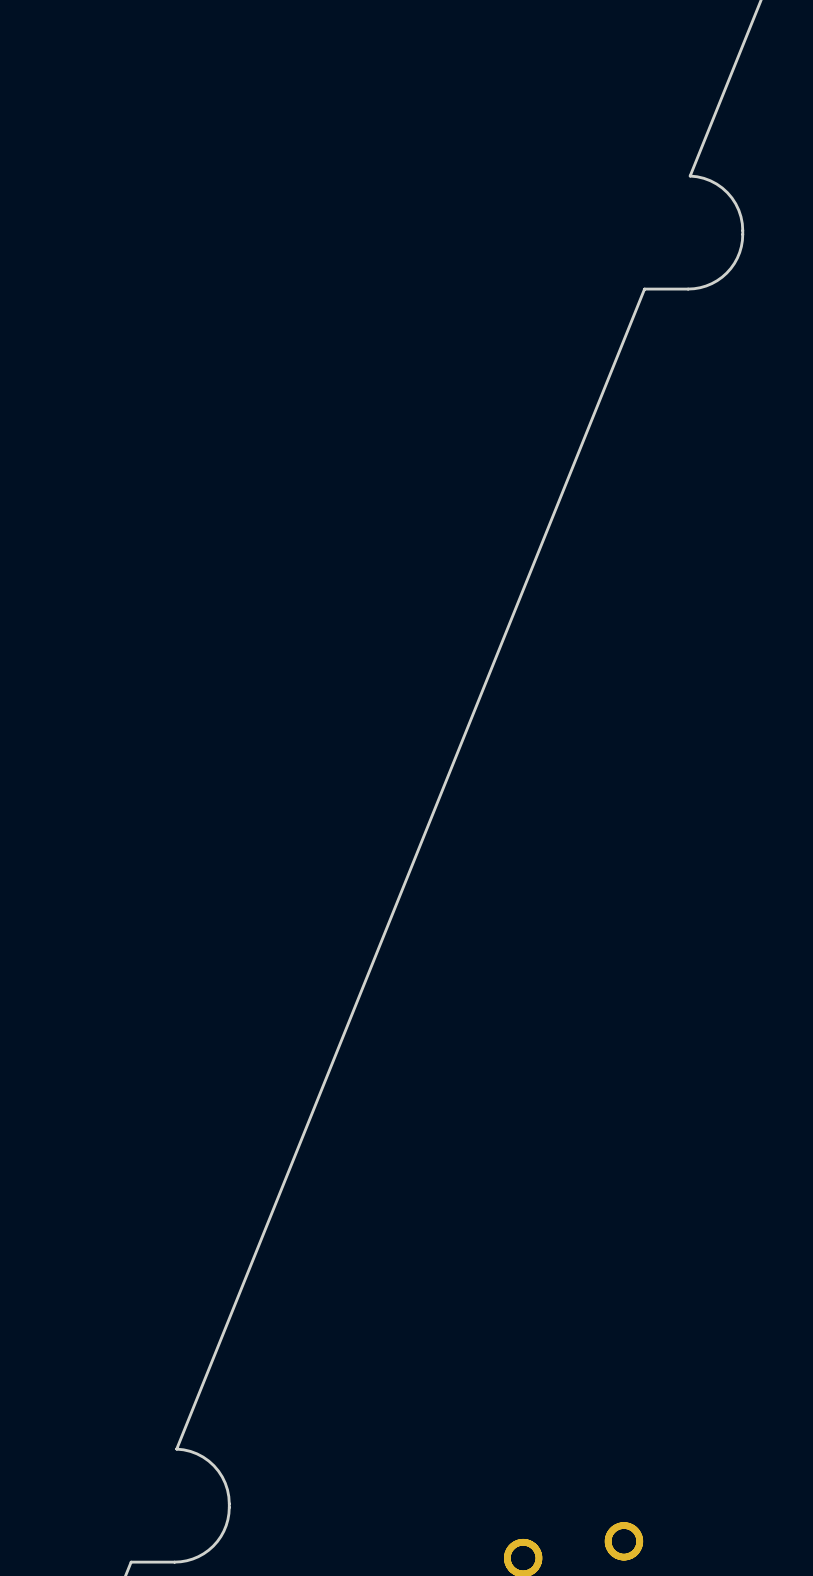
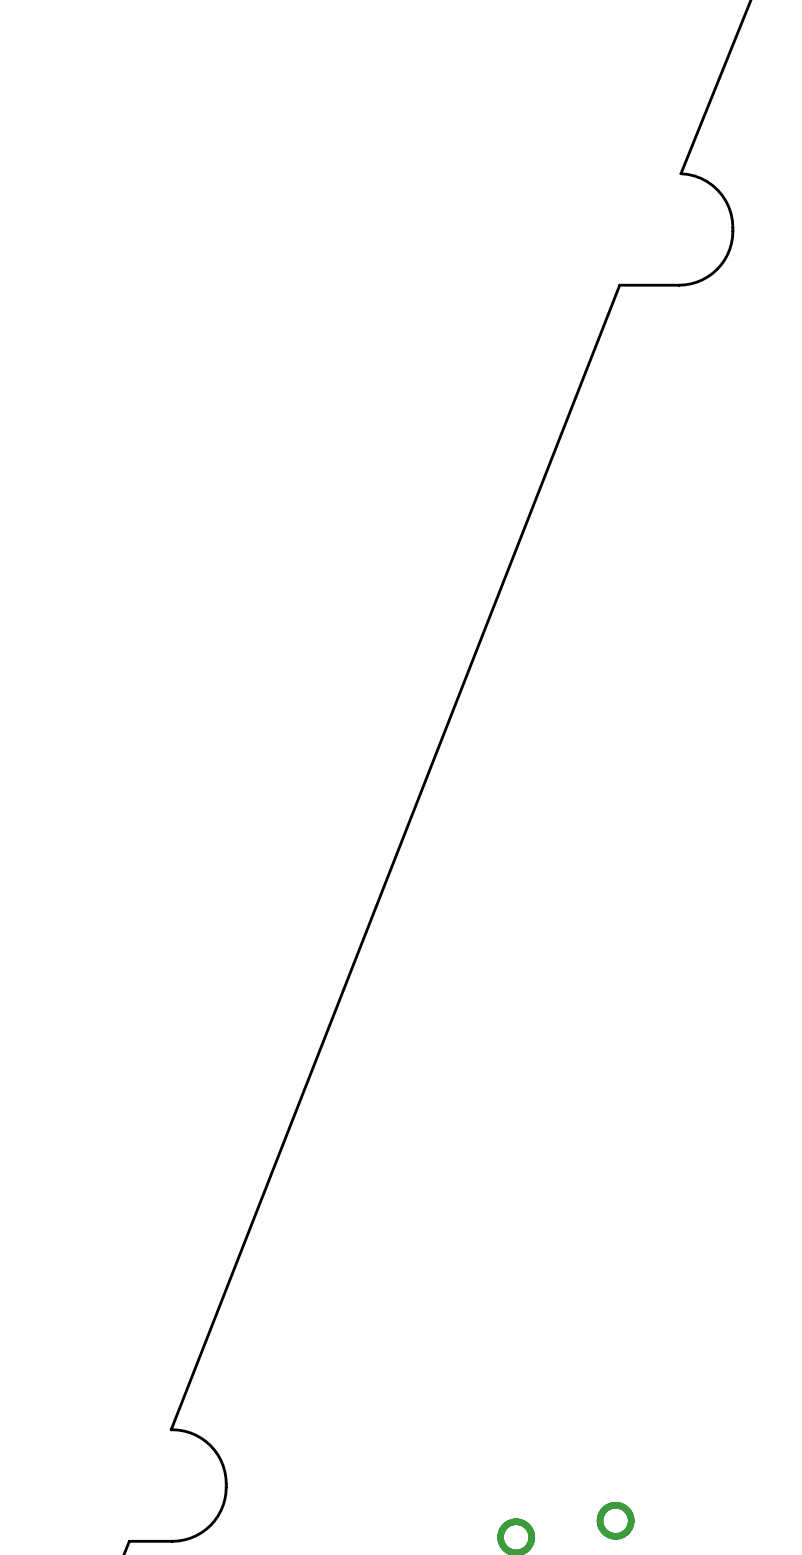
board edge: (644, 289) (176, 1449) (196, 1453) (214, 1465) (225, 1483) (229, 1503) -> (635, 285) (619, 285) (171, 1429) (190, 1432) (210, 1445) (220, 1460) (226, 1483)

